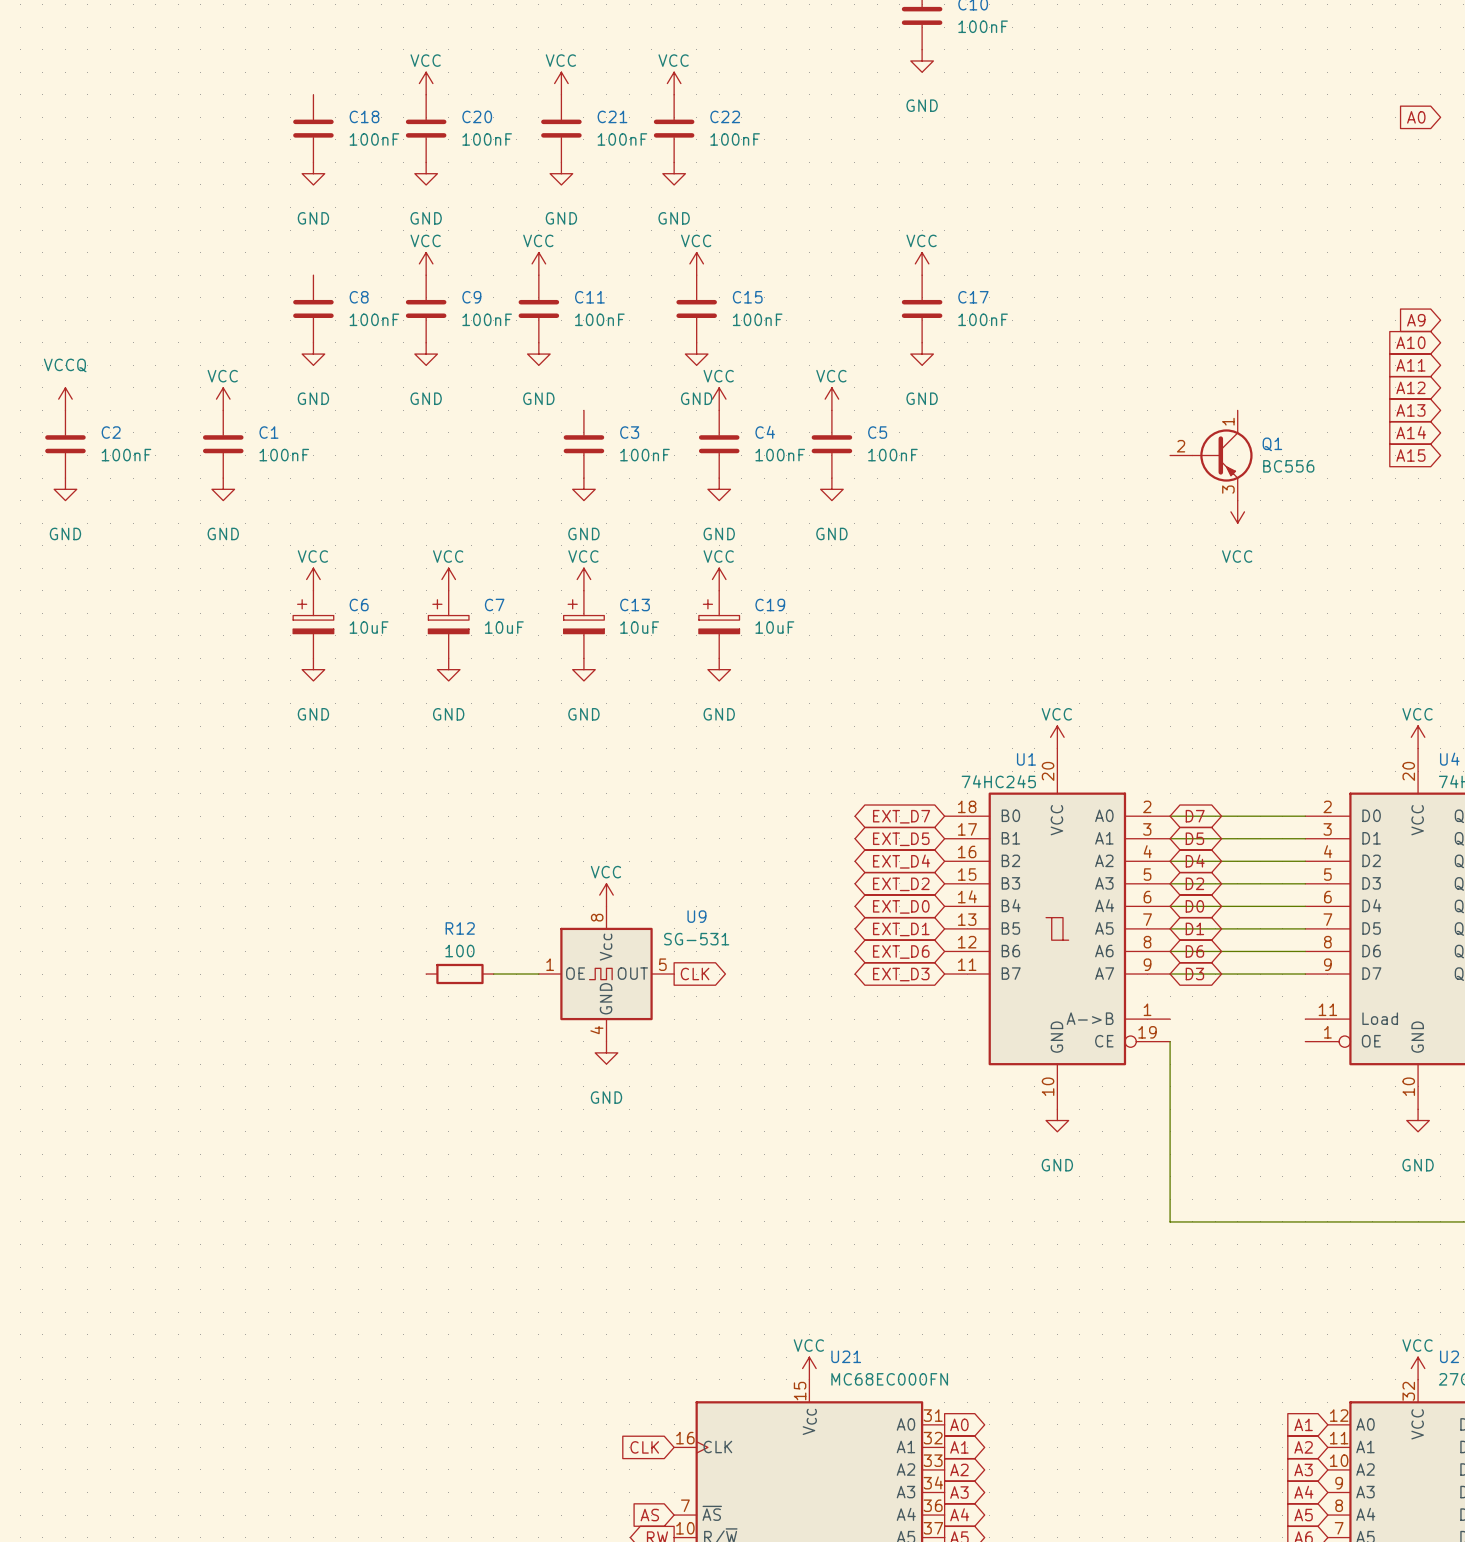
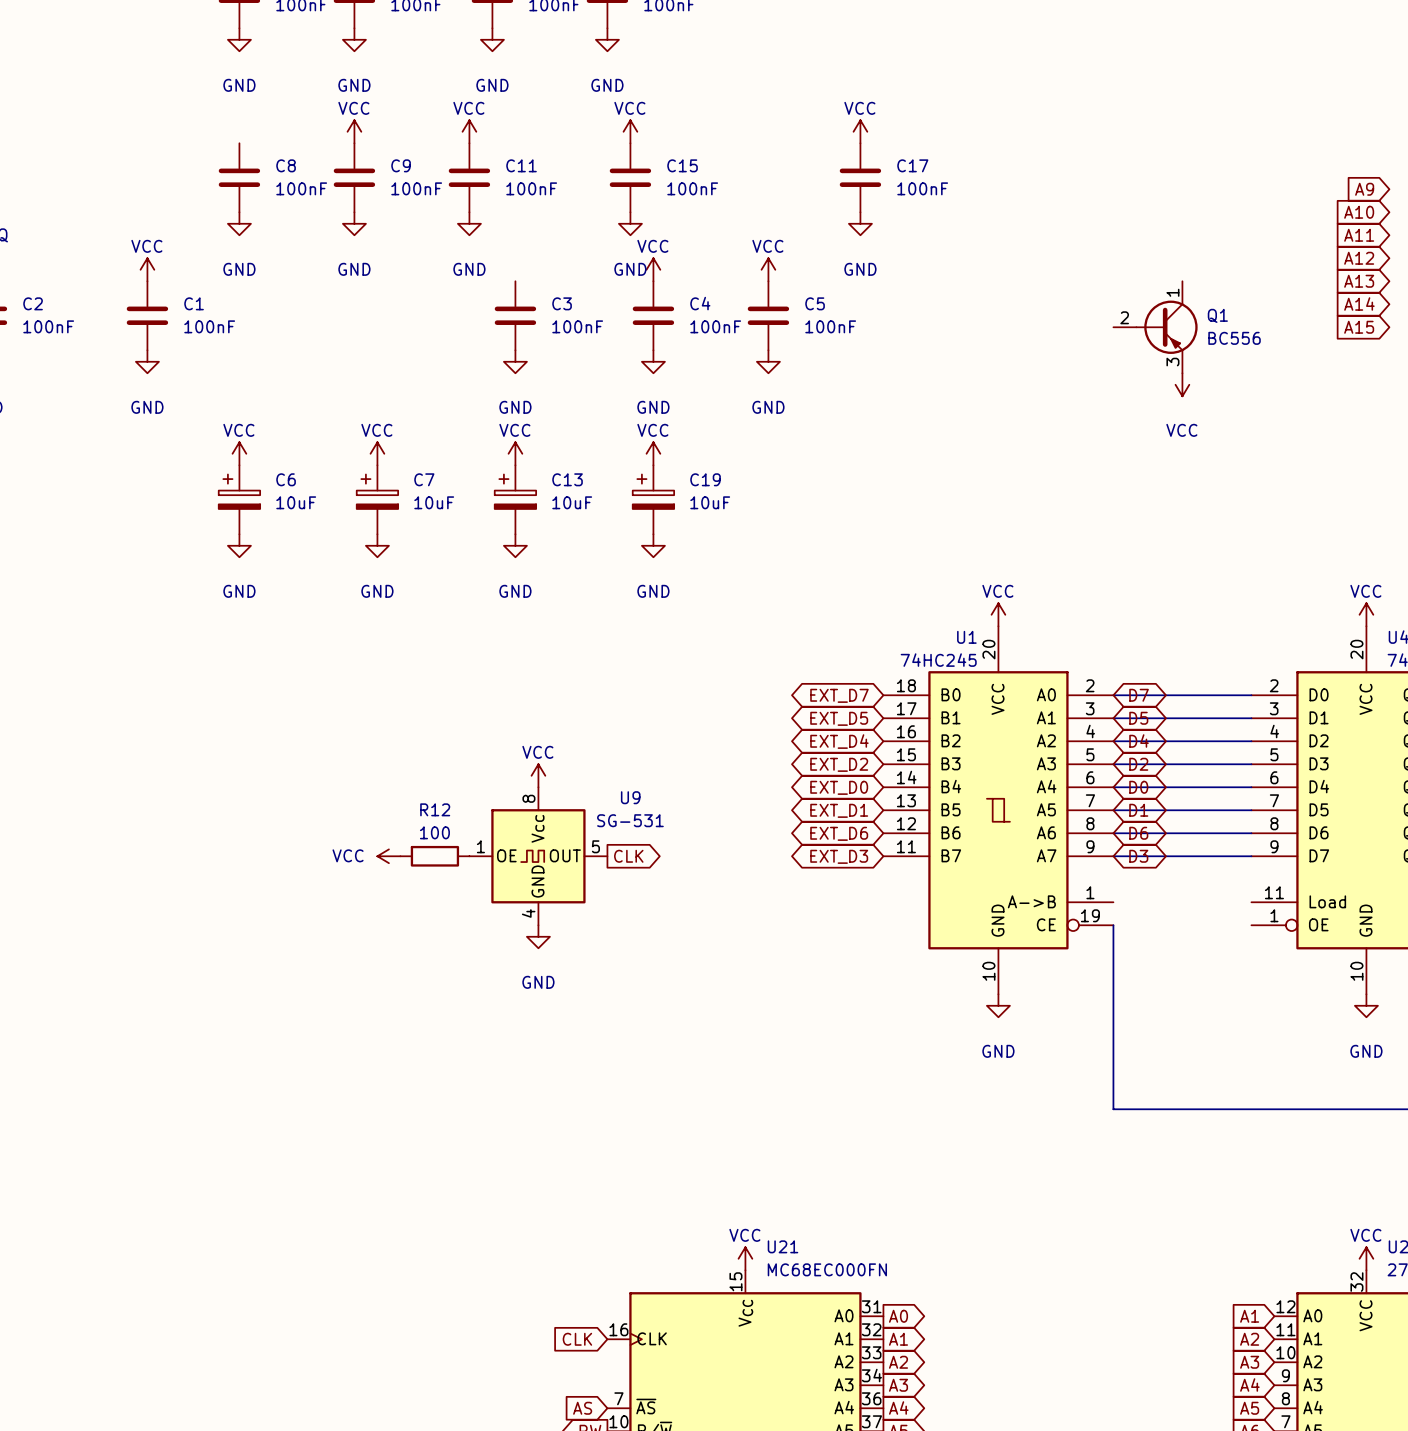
R12 position: (459, 974) -> (434, 856)
power symbol: none -> VCC (388, 856)
wire: (493, 974) (538, 974) -> none

